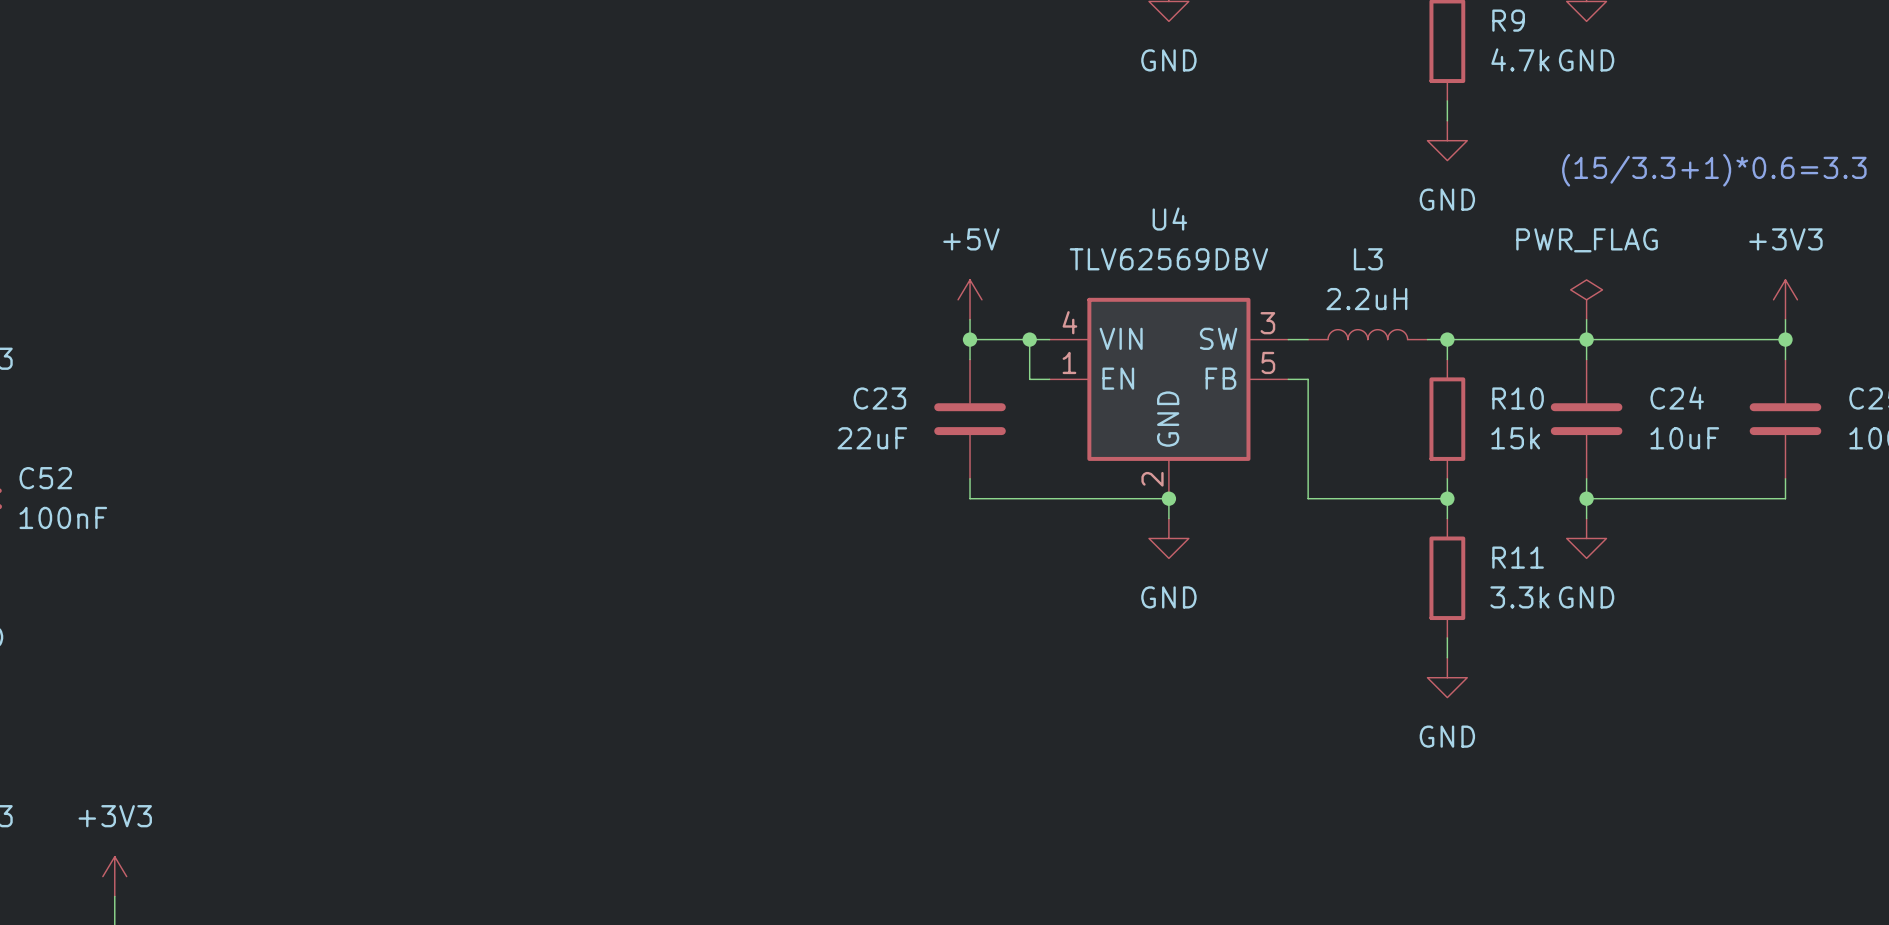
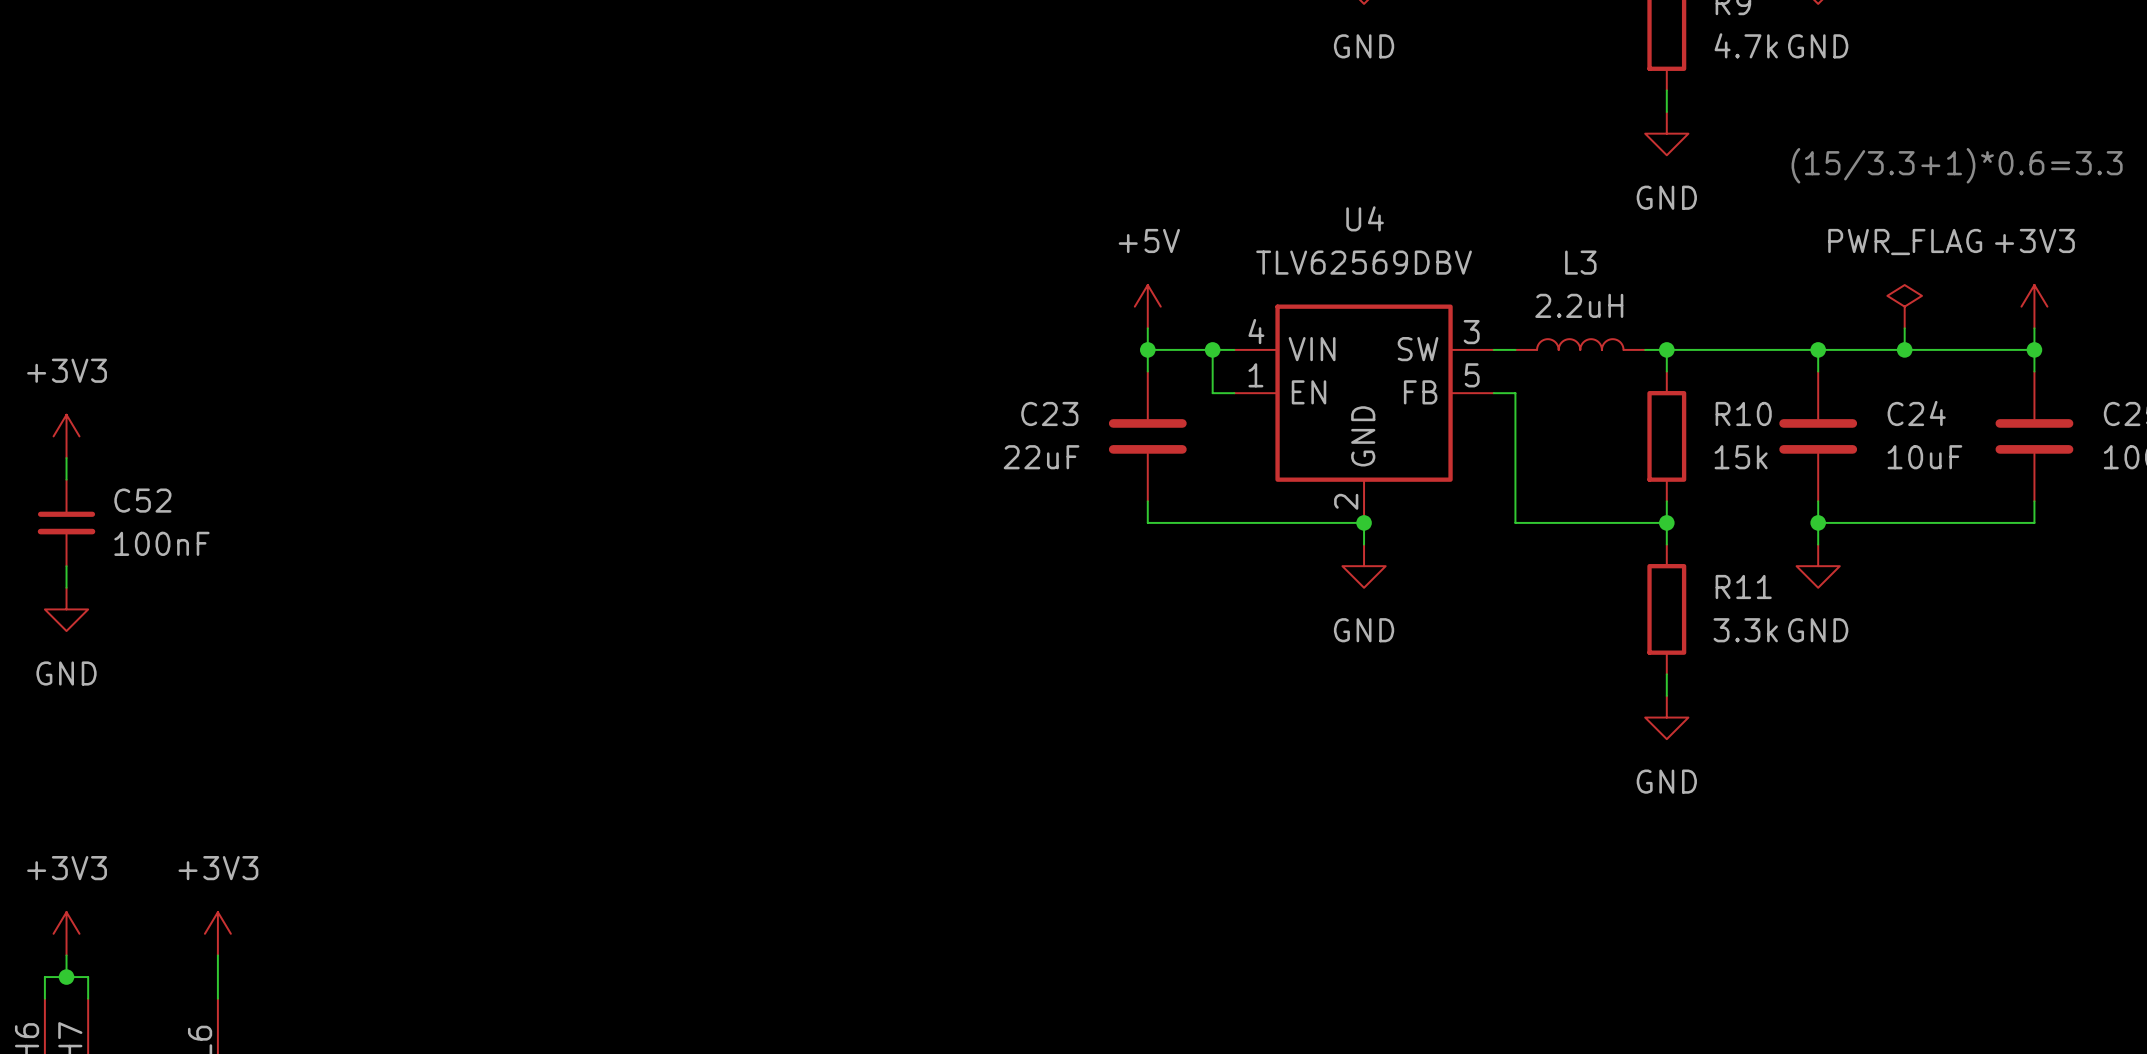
power symbol position: PWR_FLAG (1586, 299) -> PWR_FLAG (1904, 306)
wire: (1586, 319) (1586, 339) -> (1904, 328) (1904, 349)
junction: none -> (1904, 349)

